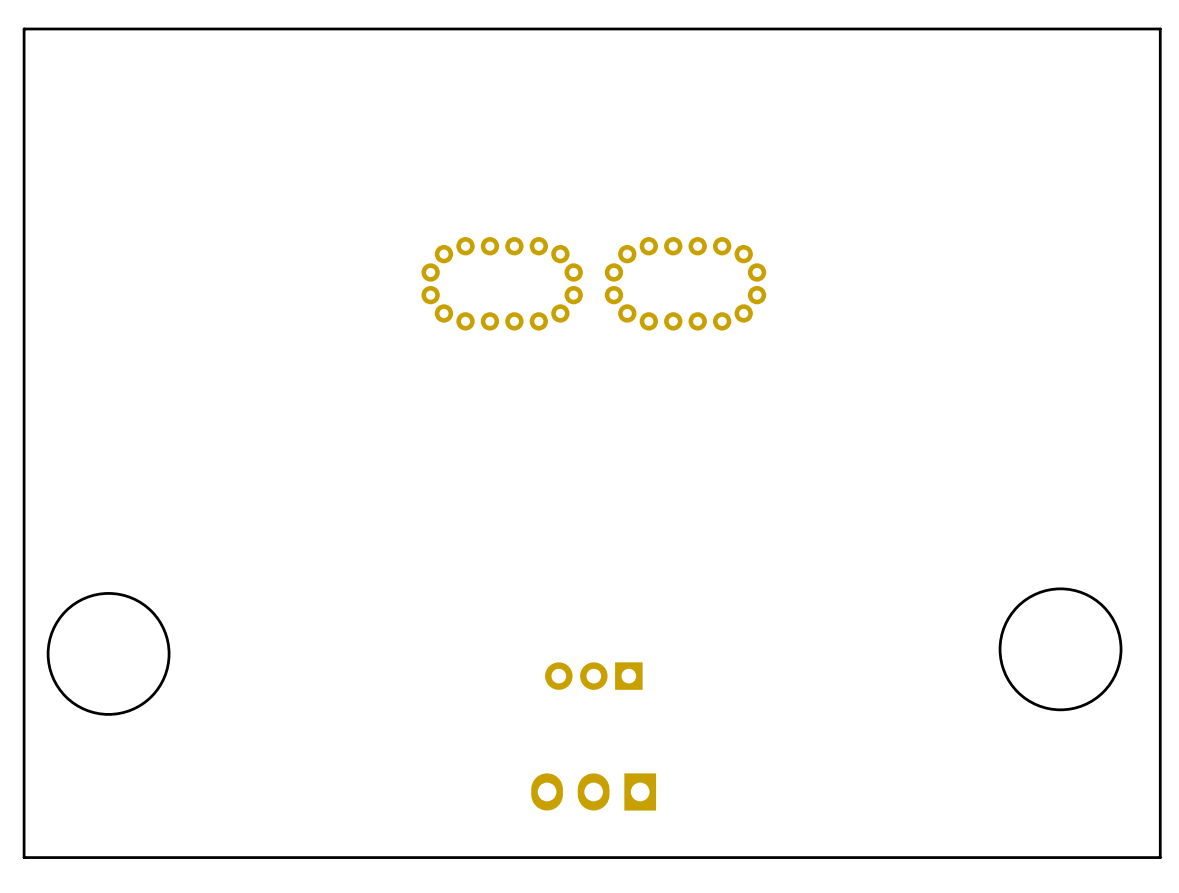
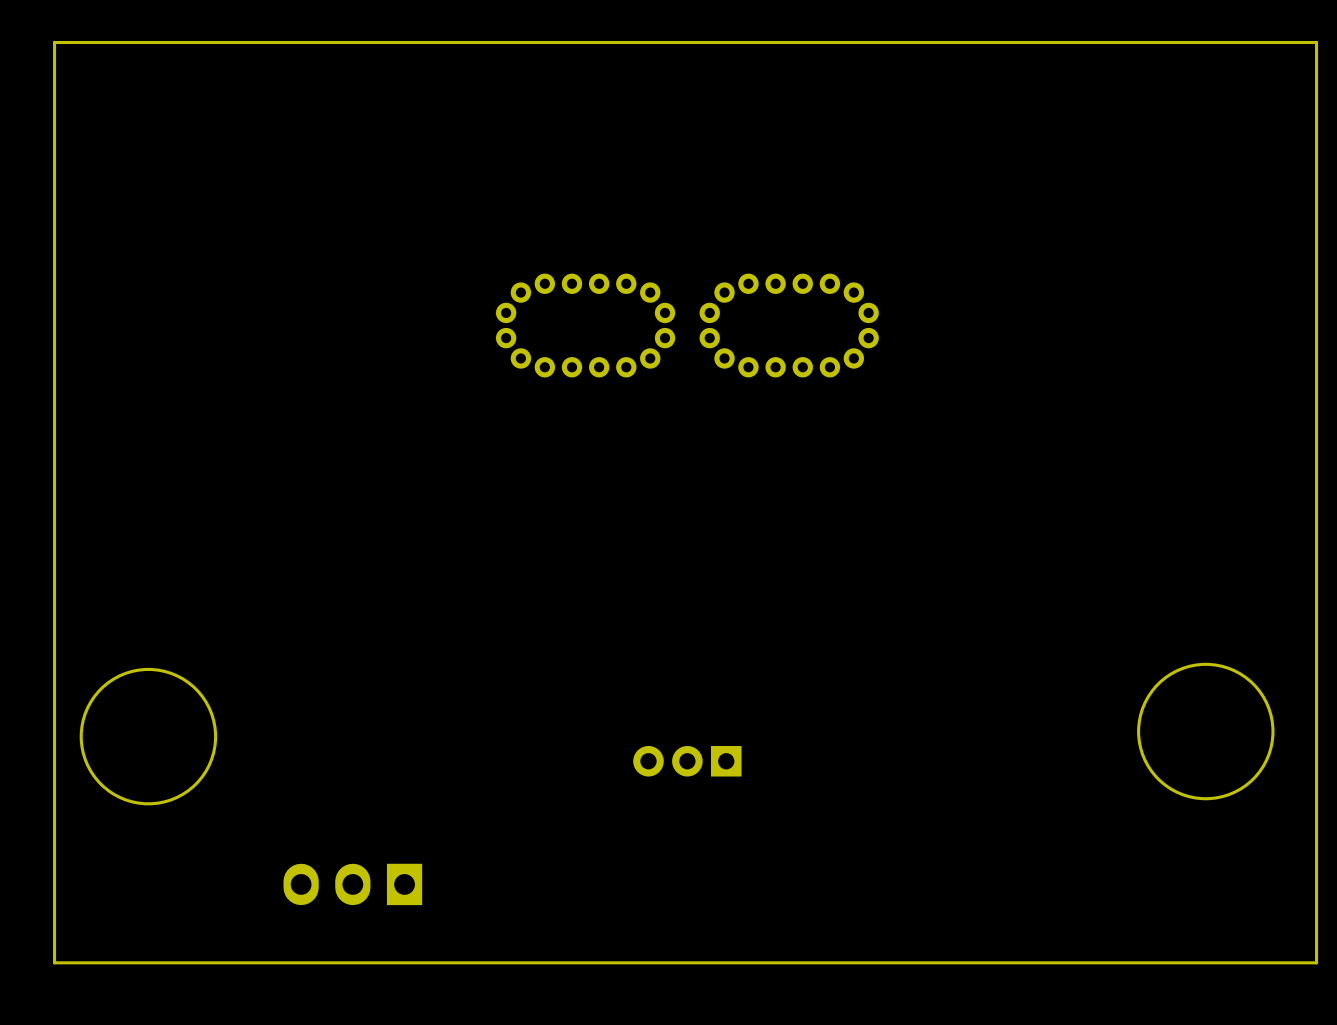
part position: (593, 791) -> (352, 884)

